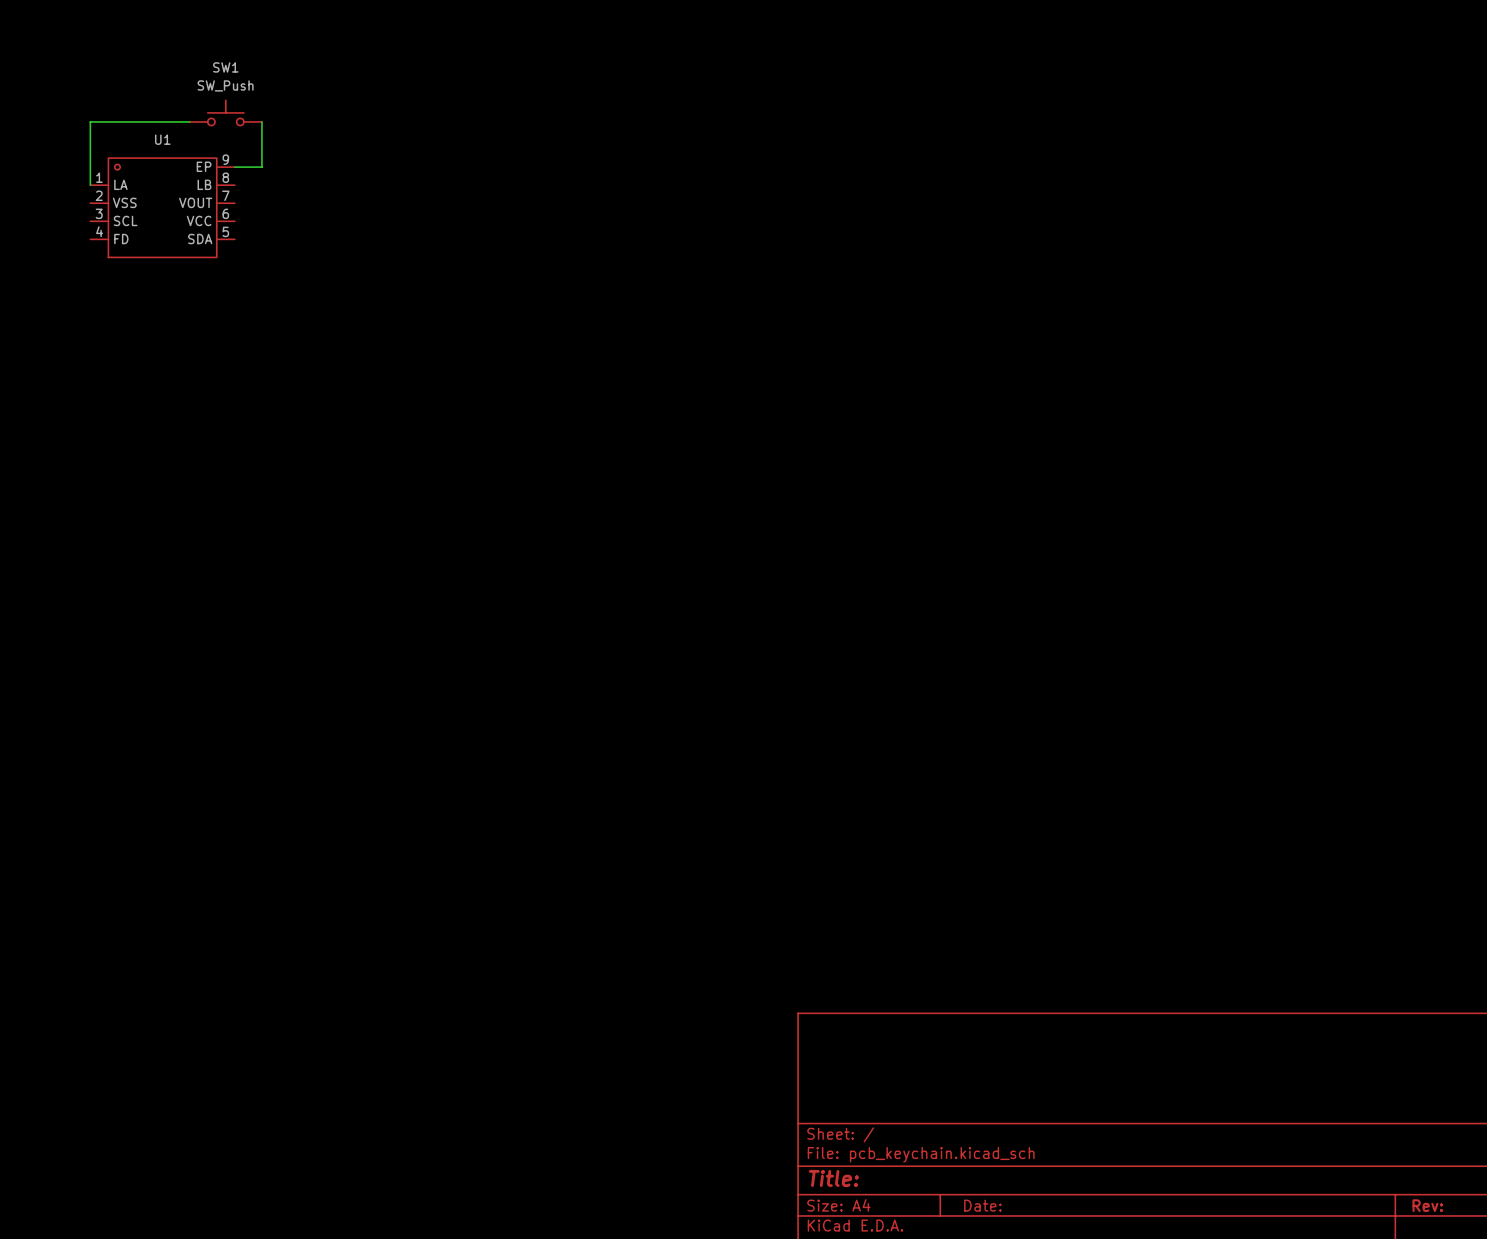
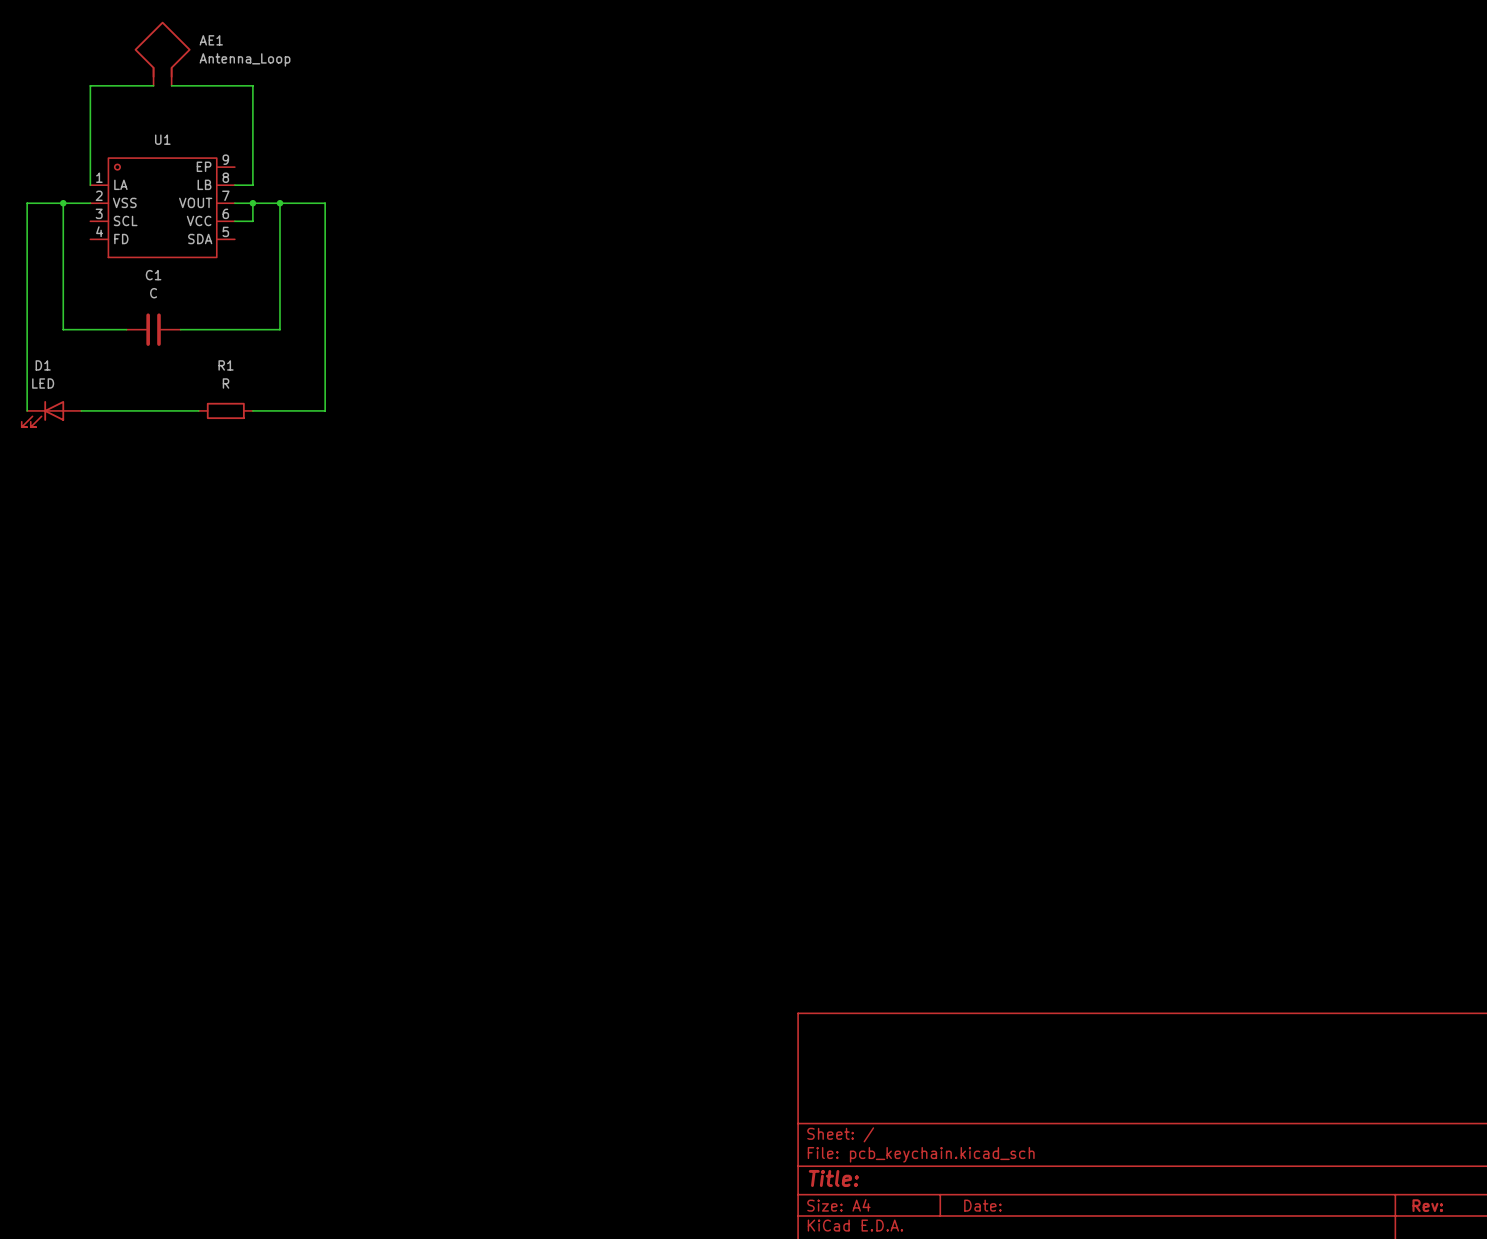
AE1: none -> Antenna_Loop (162, 53)
wire: none -> (171, 85) (252, 85) (252, 185) (234, 185)
SW1: SW_Push (225, 112) -> none
wire: (90, 121) (189, 121) -> (90, 121) (90, 85) (153, 85)
wire: (261, 121) (261, 167) (234, 167) -> none
wire: none -> (63, 203) (63, 329) (126, 329)
junction: none -> (63, 203)
wire: none -> (90, 203) (27, 203) (27, 410)
wire: none -> (234, 203) (325, 203) (325, 410) (252, 410)
wire: none -> (252, 203) (252, 221) (234, 221)
junction: none -> (252, 203)
wire: none -> (279, 203) (279, 329) (180, 329)
junction: none -> (279, 203)
C1: none -> C (153, 329)
wire: none -> (81, 410) (198, 410)
R1: none -> R (225, 410)
D1: none -> LED (51, 414)

